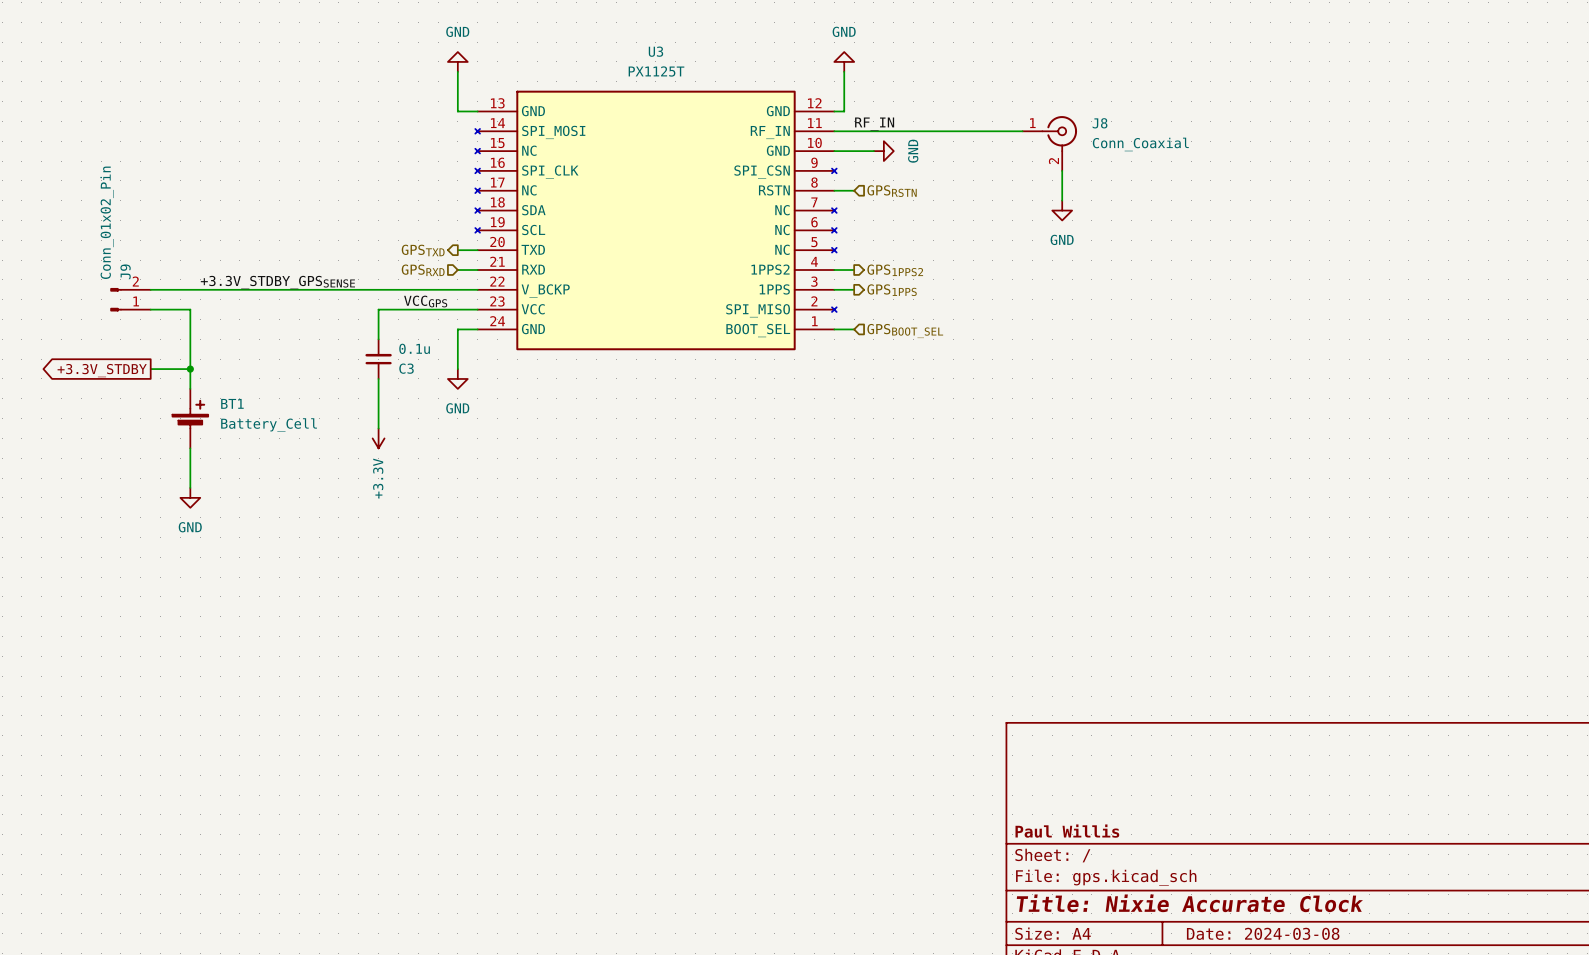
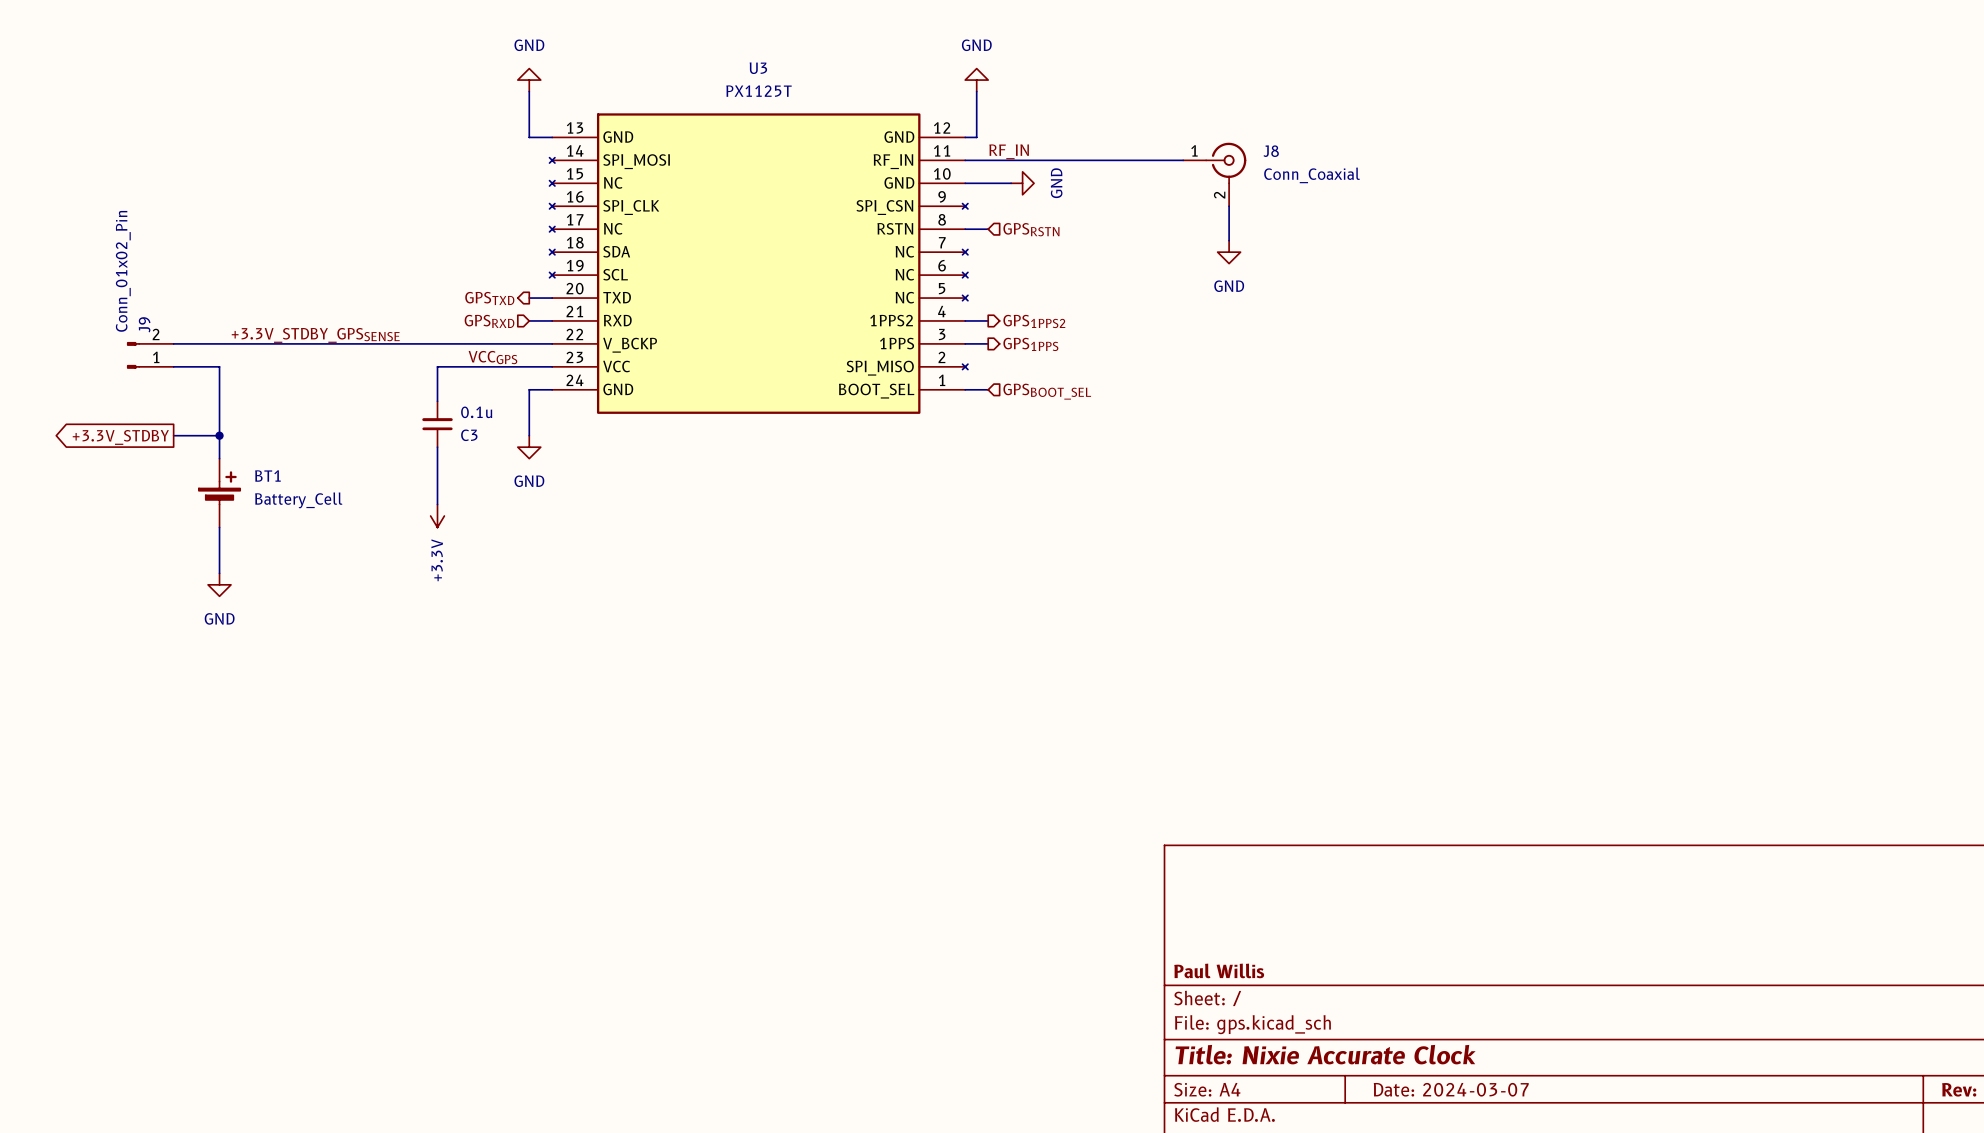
title block: Date: 2024-03-08 (1263, 933) -> Date: 2024-03-07 (1451, 1089)

